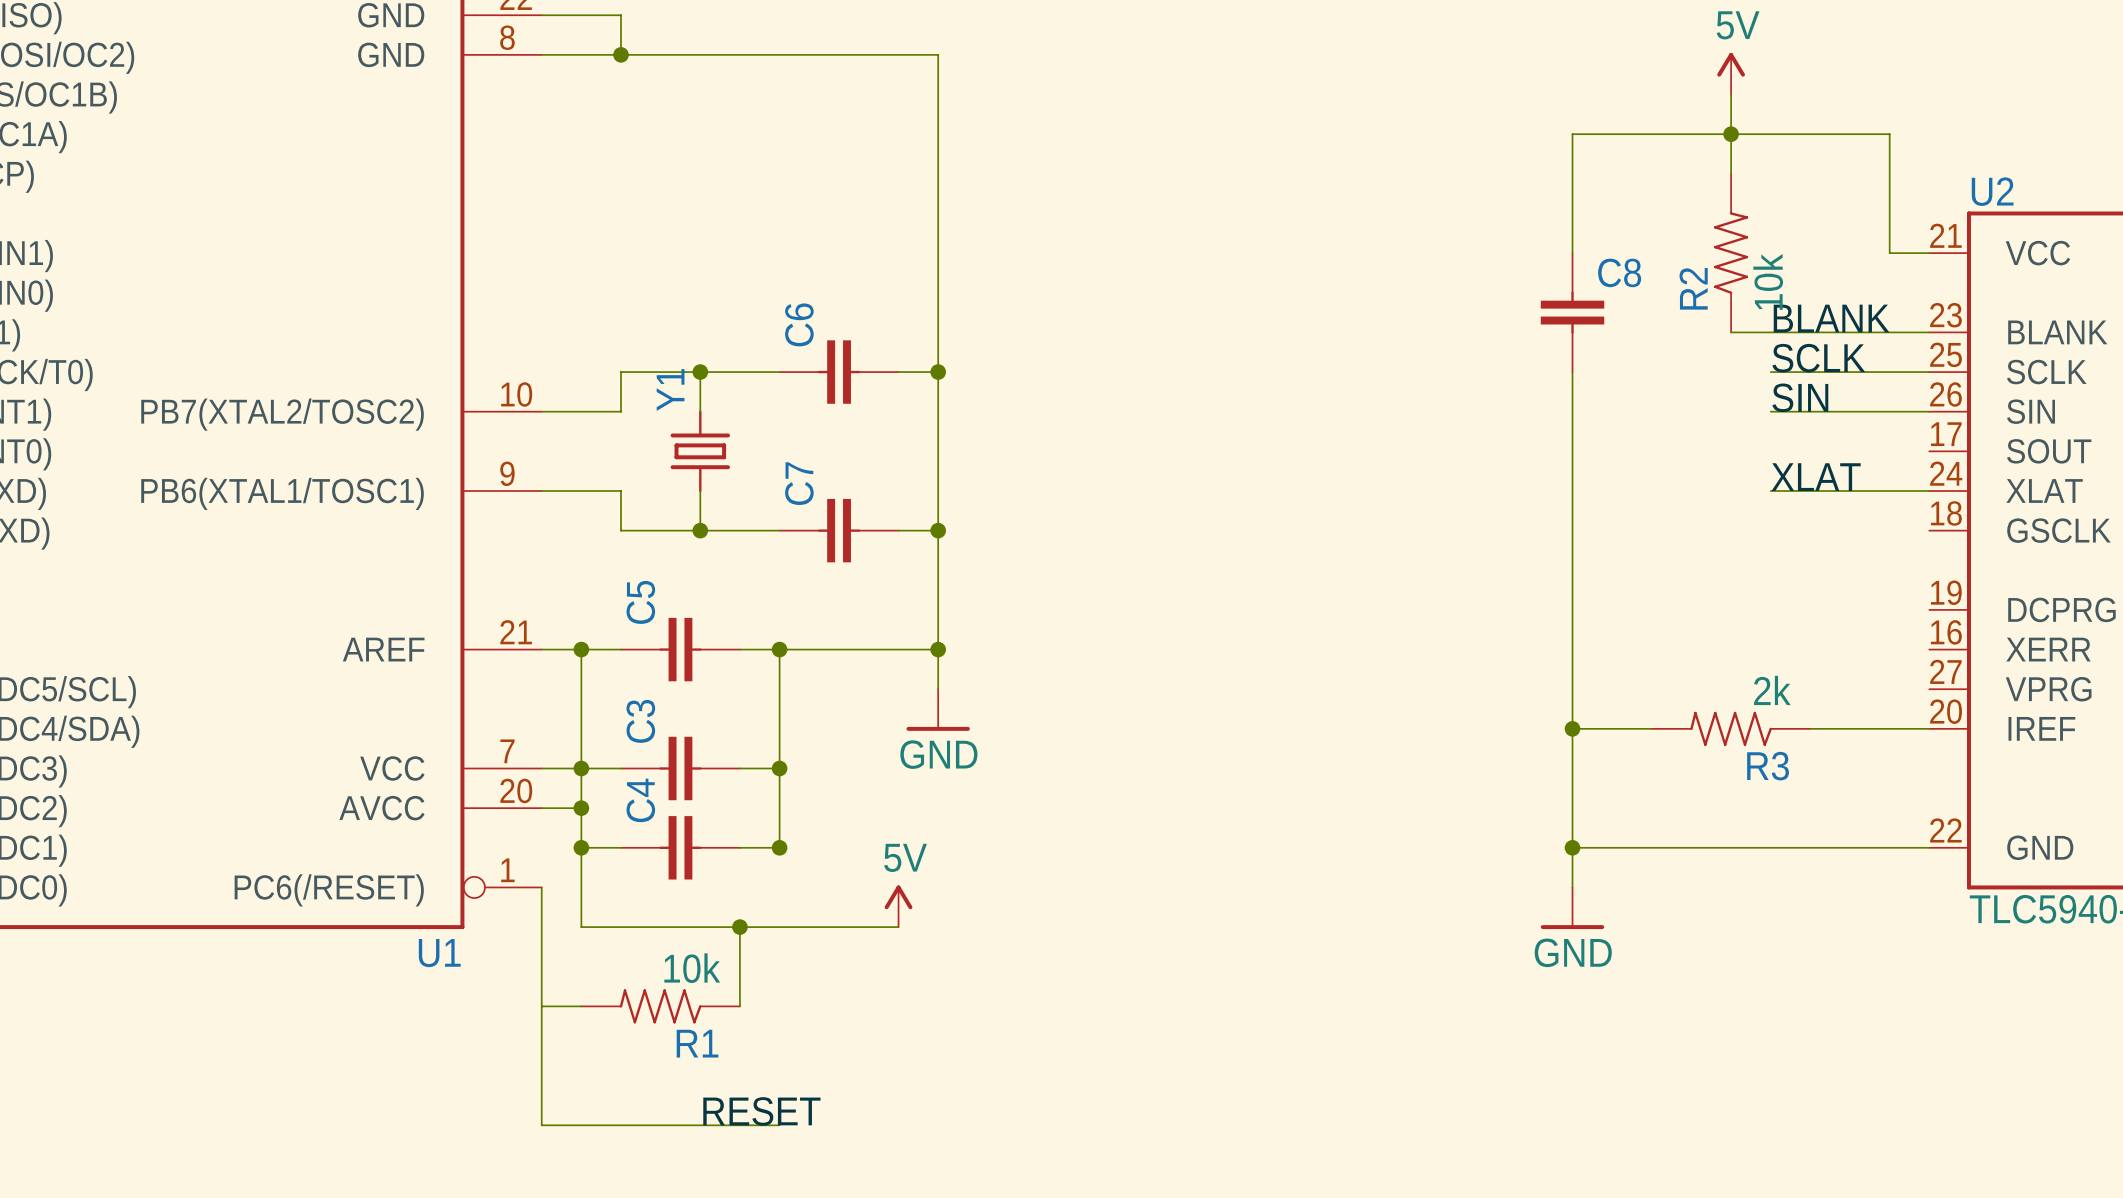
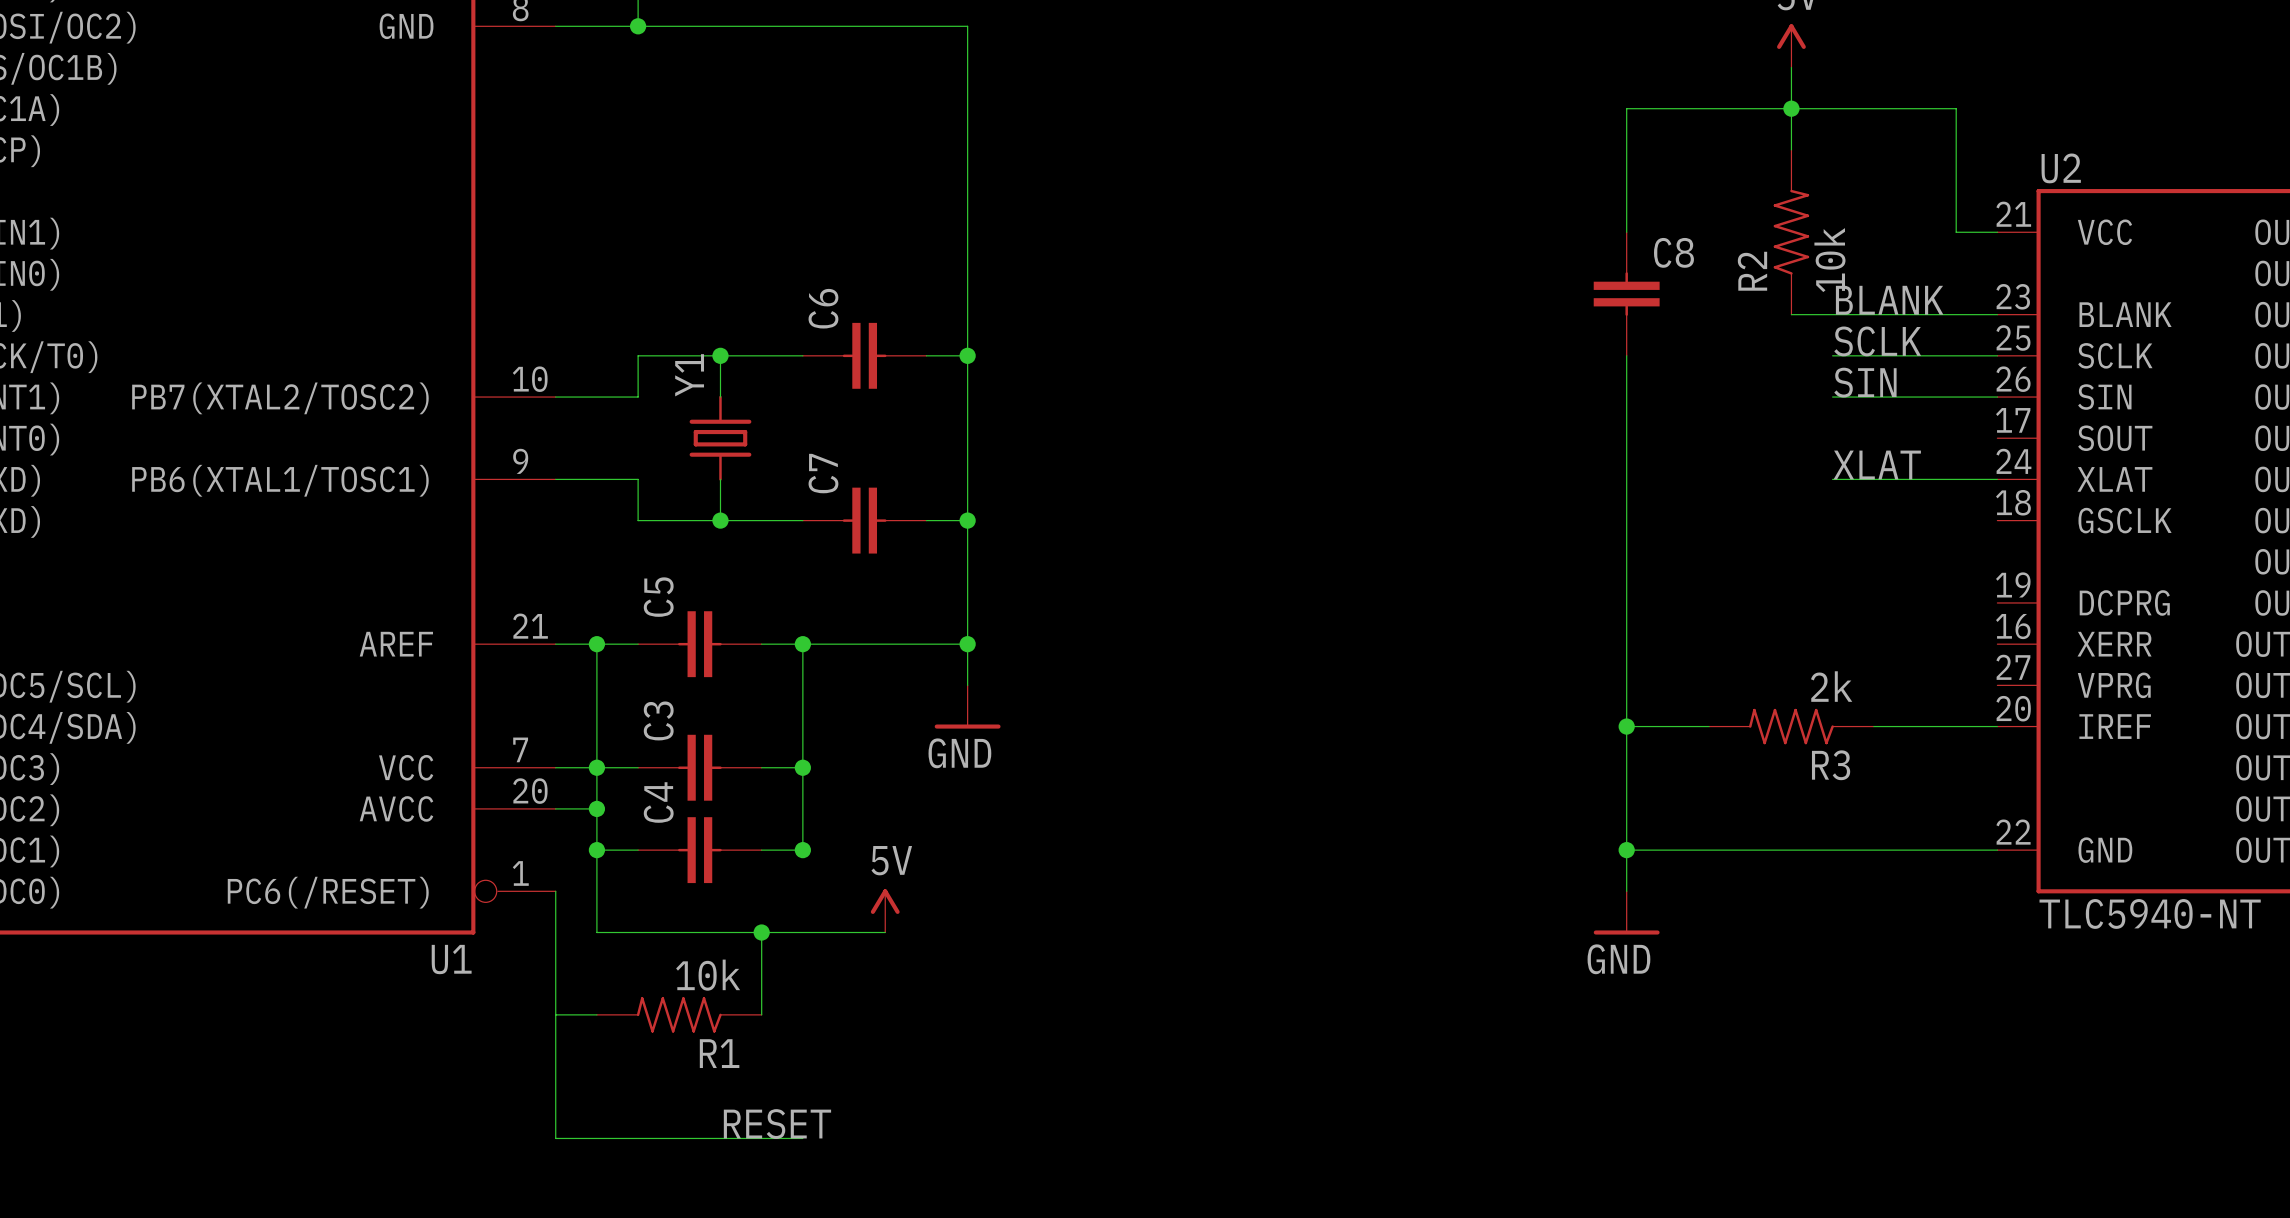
power symbol position: 5V (898, 906) -> 5V (885, 910)
wire: (858, 927) (898, 927) -> none

